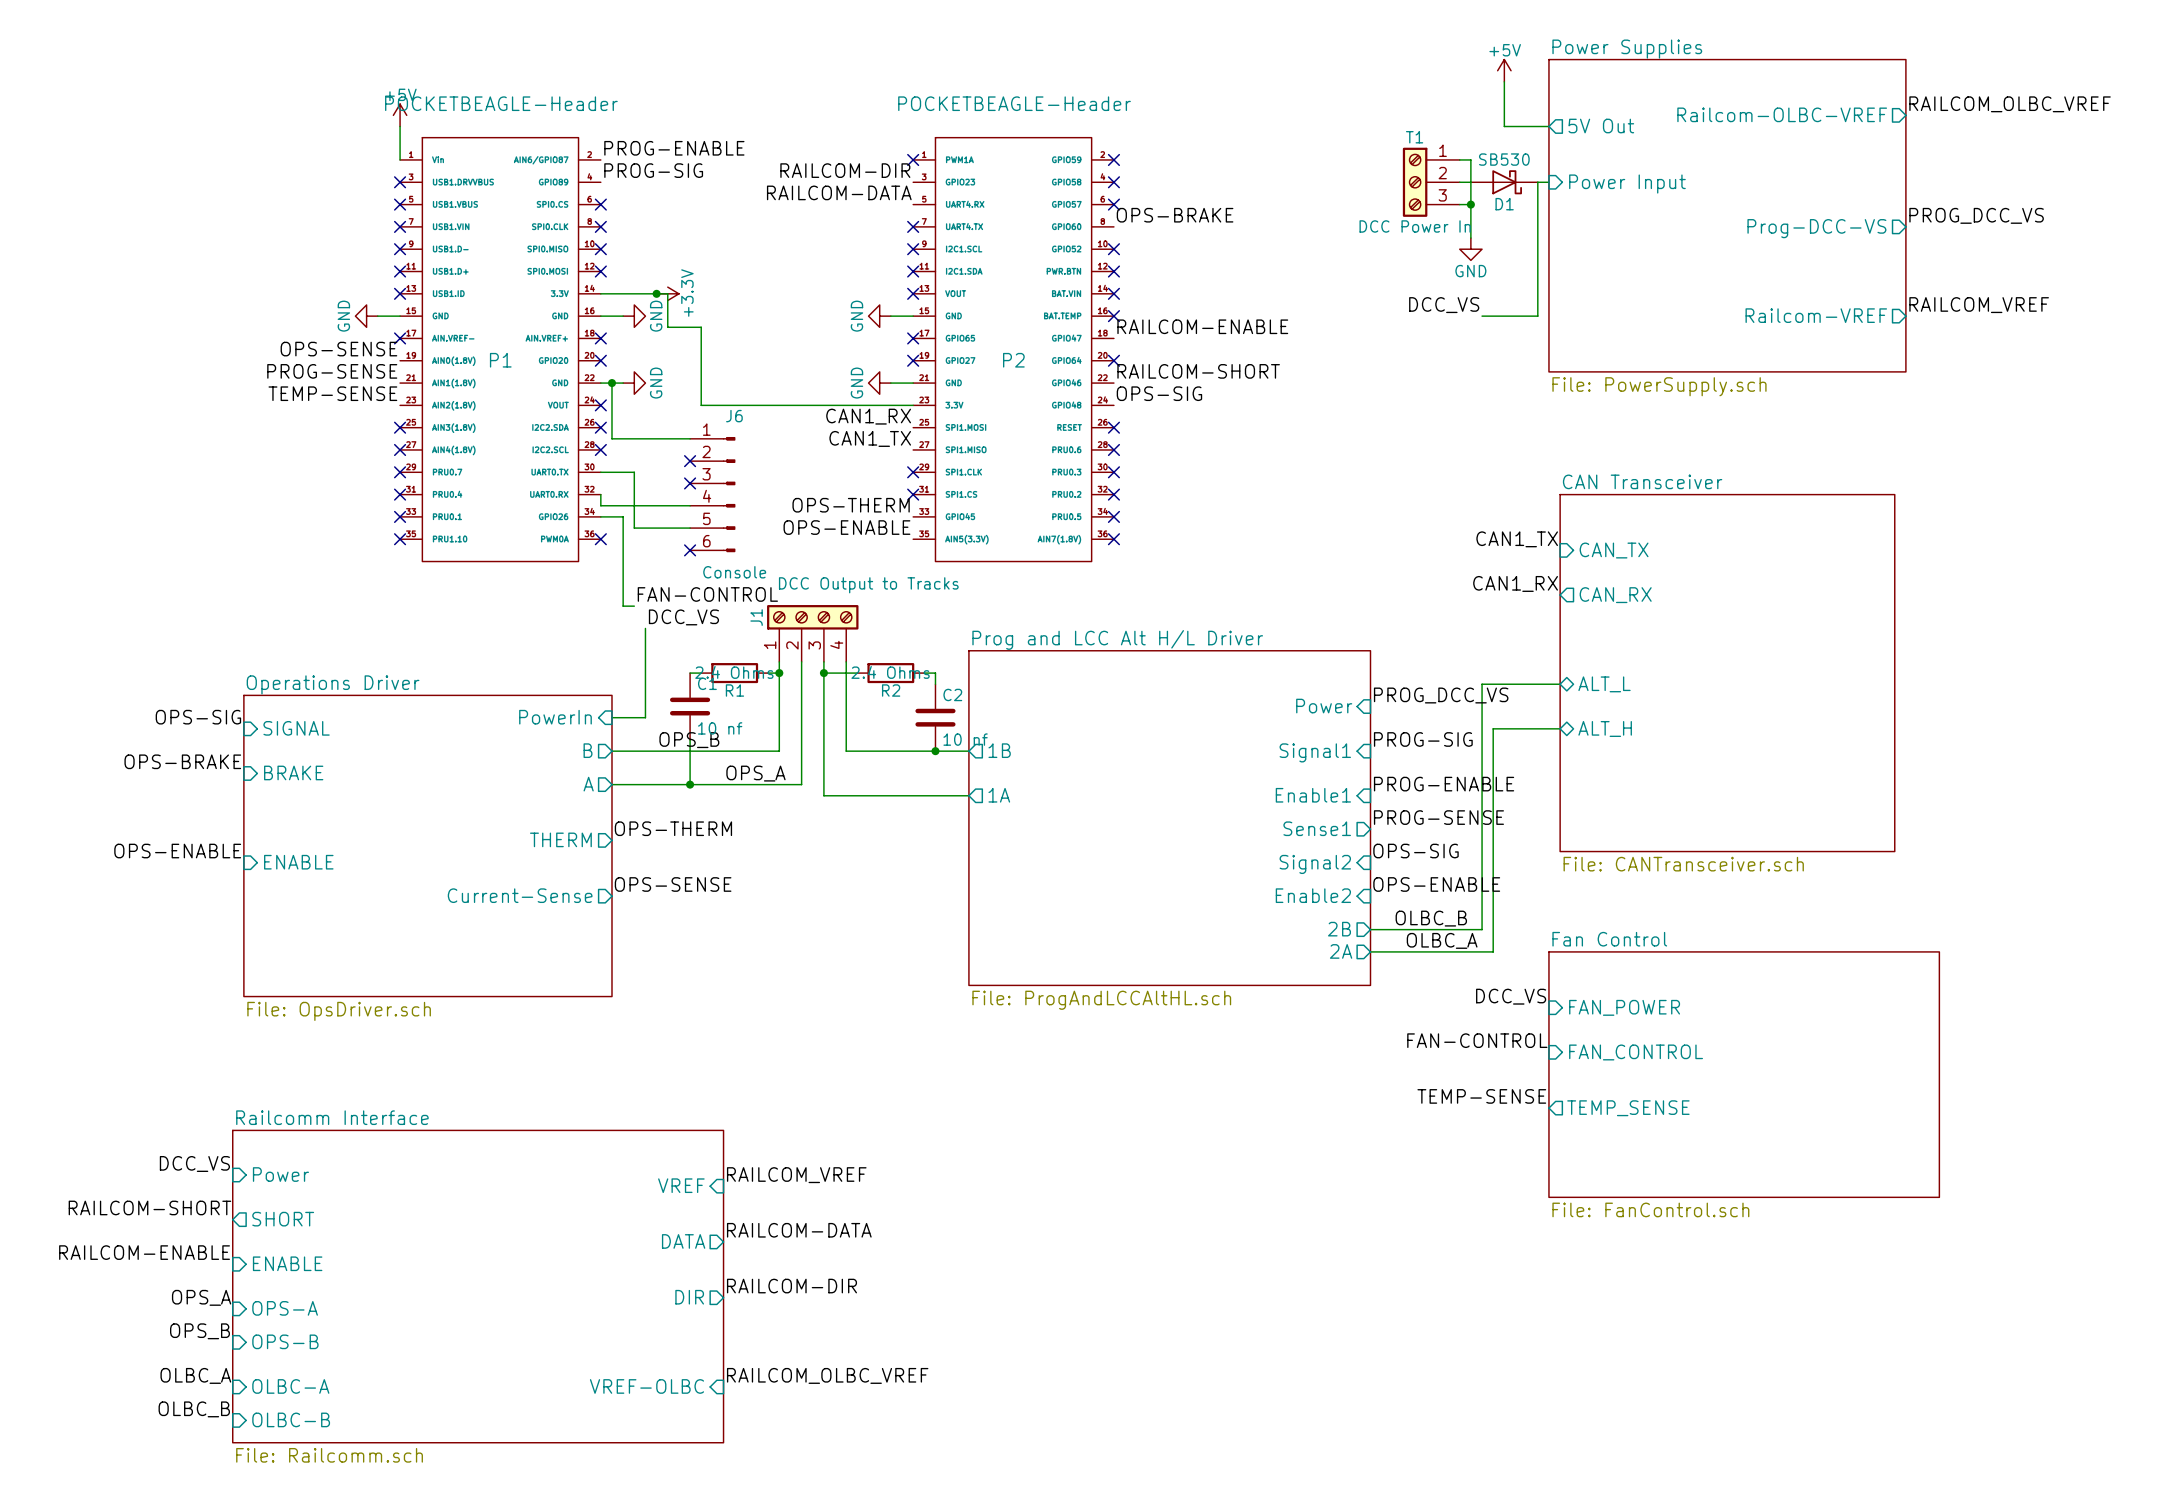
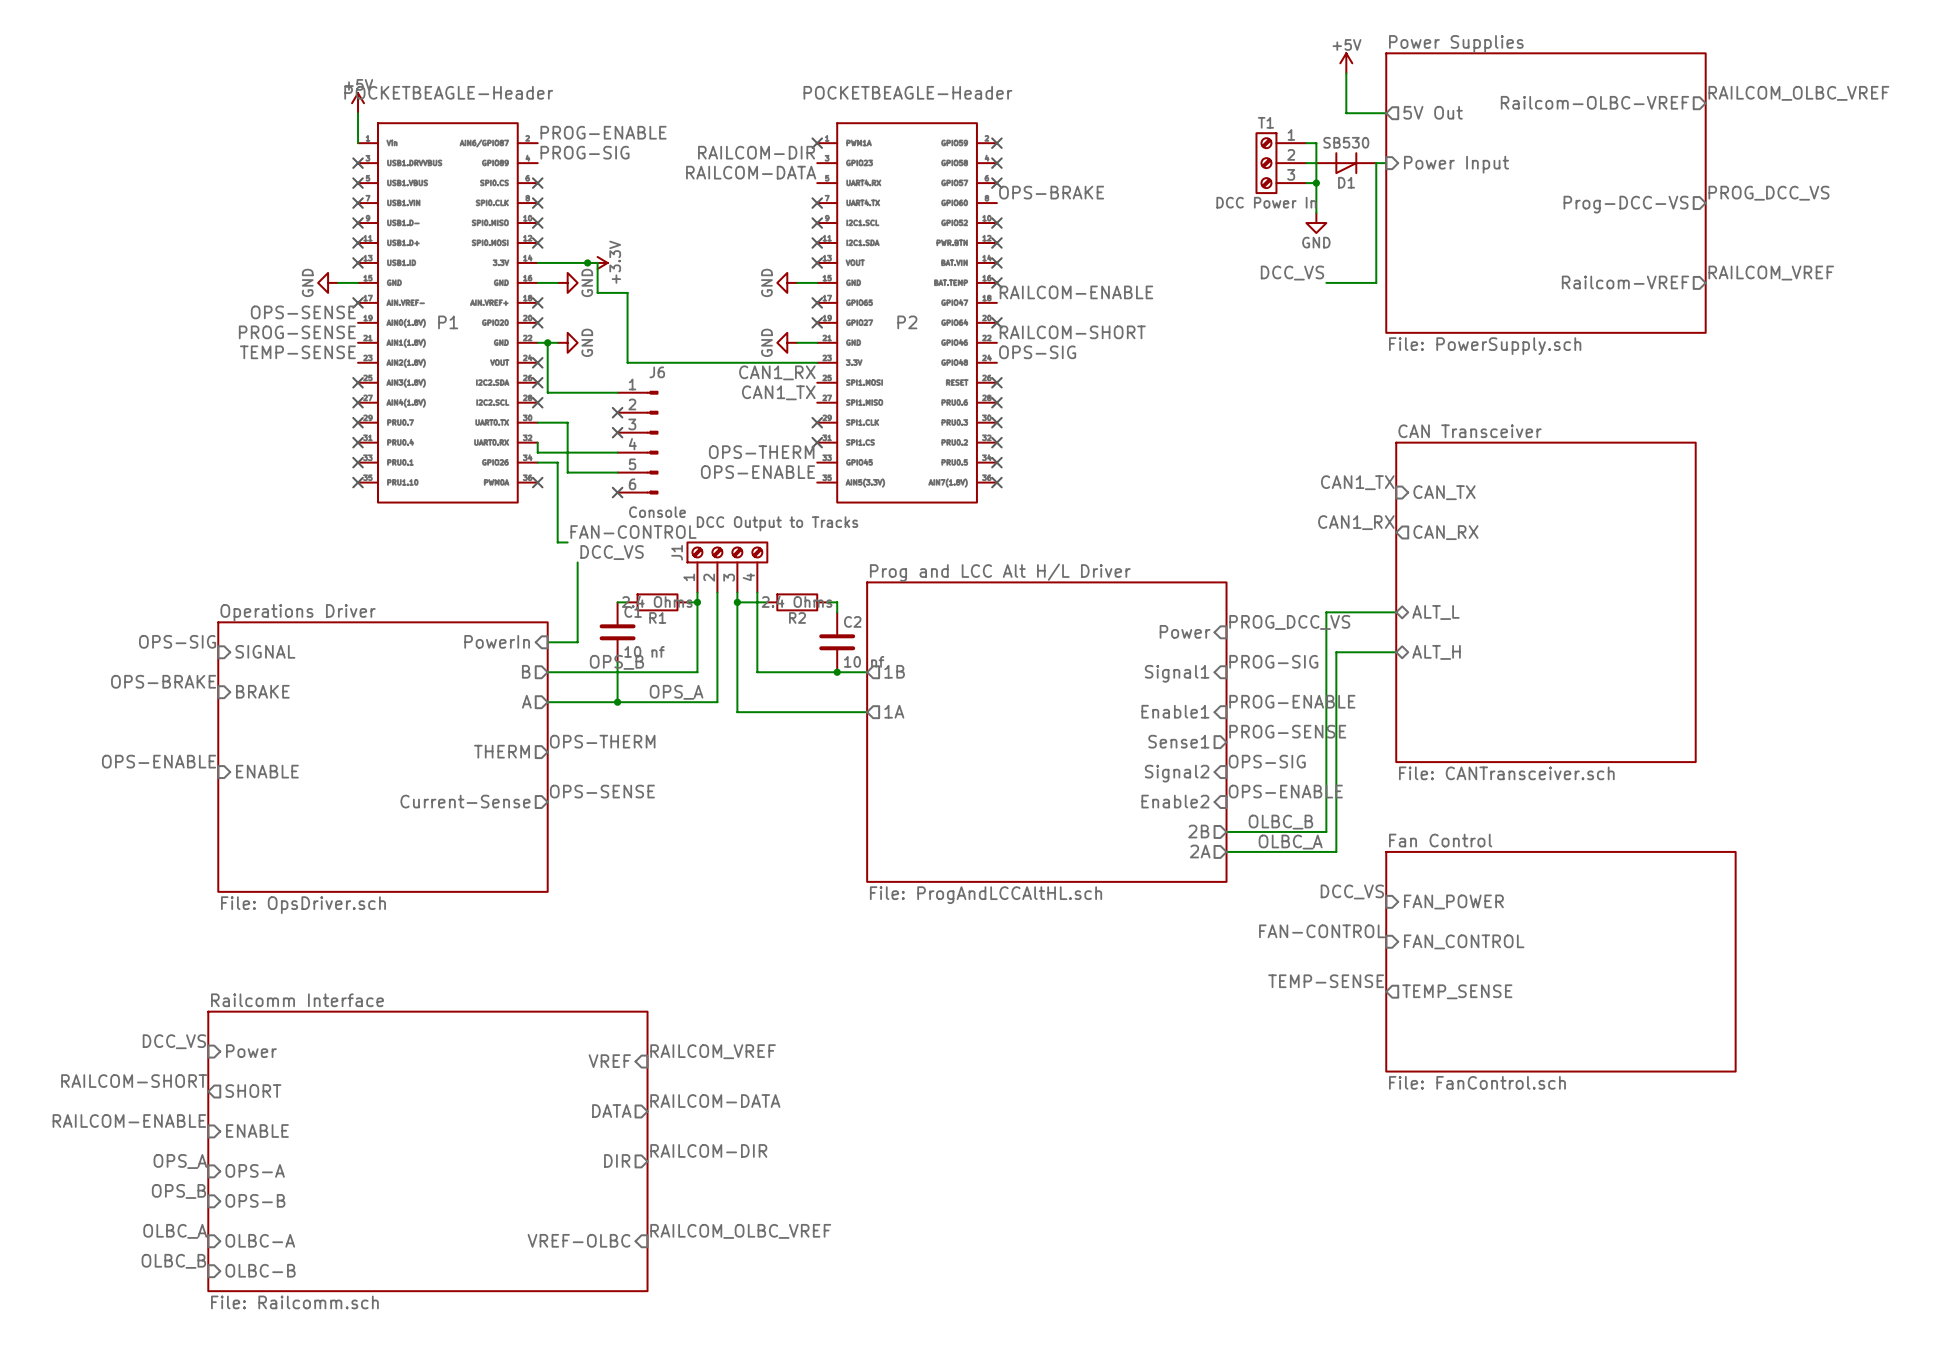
D1 symbol: [1470, 170, 1538, 195] -> [1316, 152, 1377, 174]

